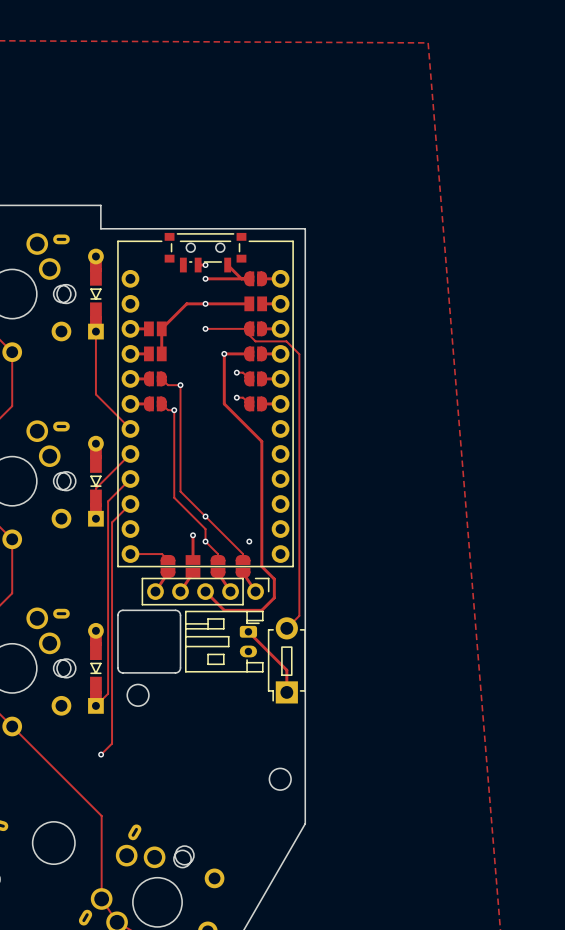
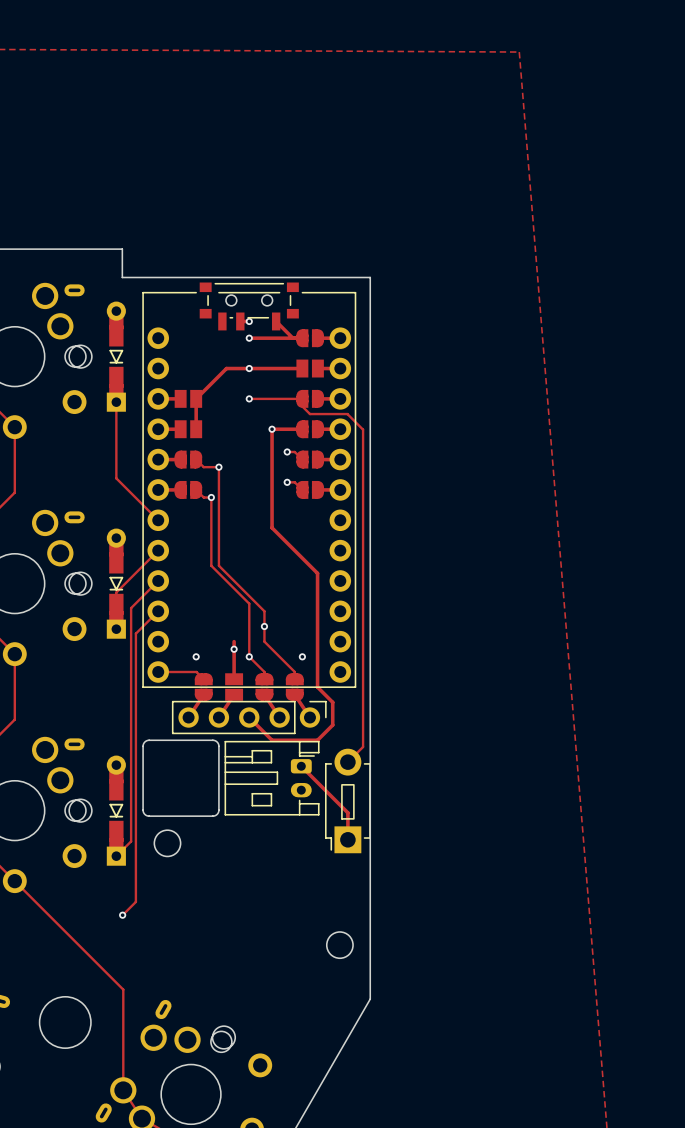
track: (224, 403) (261, 441) (261, 472) -> (272, 489) (272, 527) (317, 573)
track: (174, 466) (174, 497) (205, 529) -> (211, 565) (249, 603) (249, 641)
track: (180, 466) (180, 491) (218, 529) -> (218, 565) (264, 611) (264, 641)
via position: (205, 516) -> (264, 626)
track: none -> (234, 641) (234, 649)
via: none -> (196, 656)

